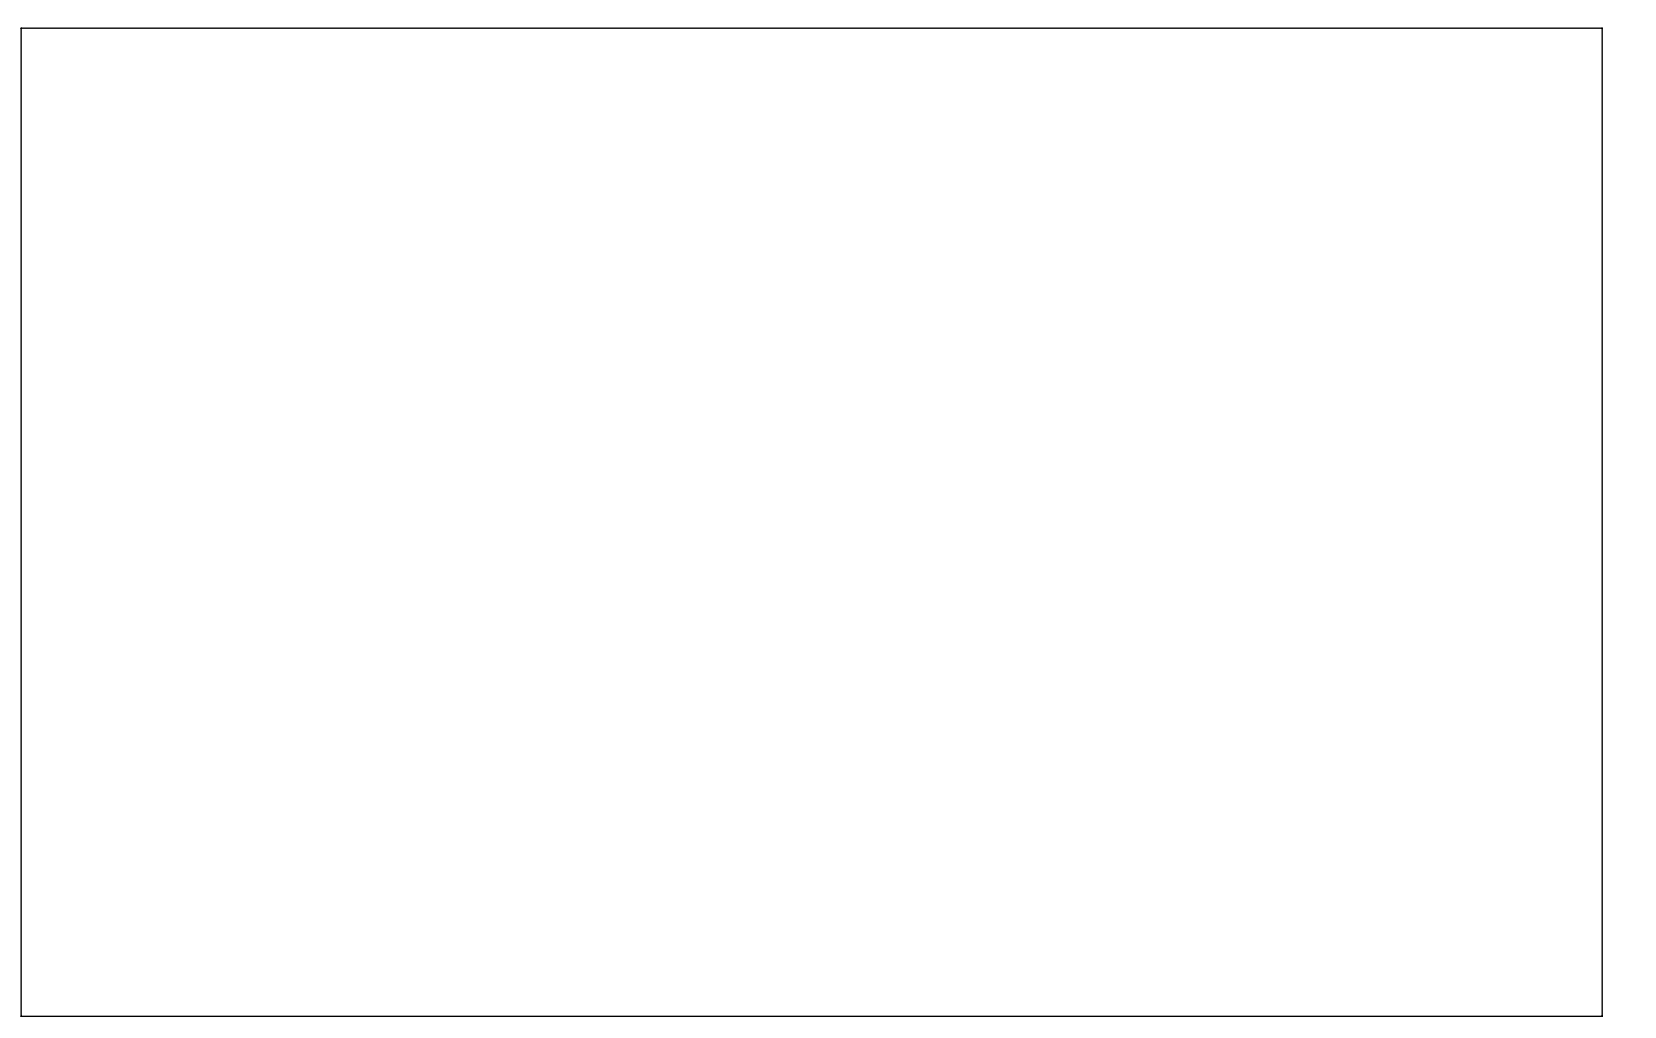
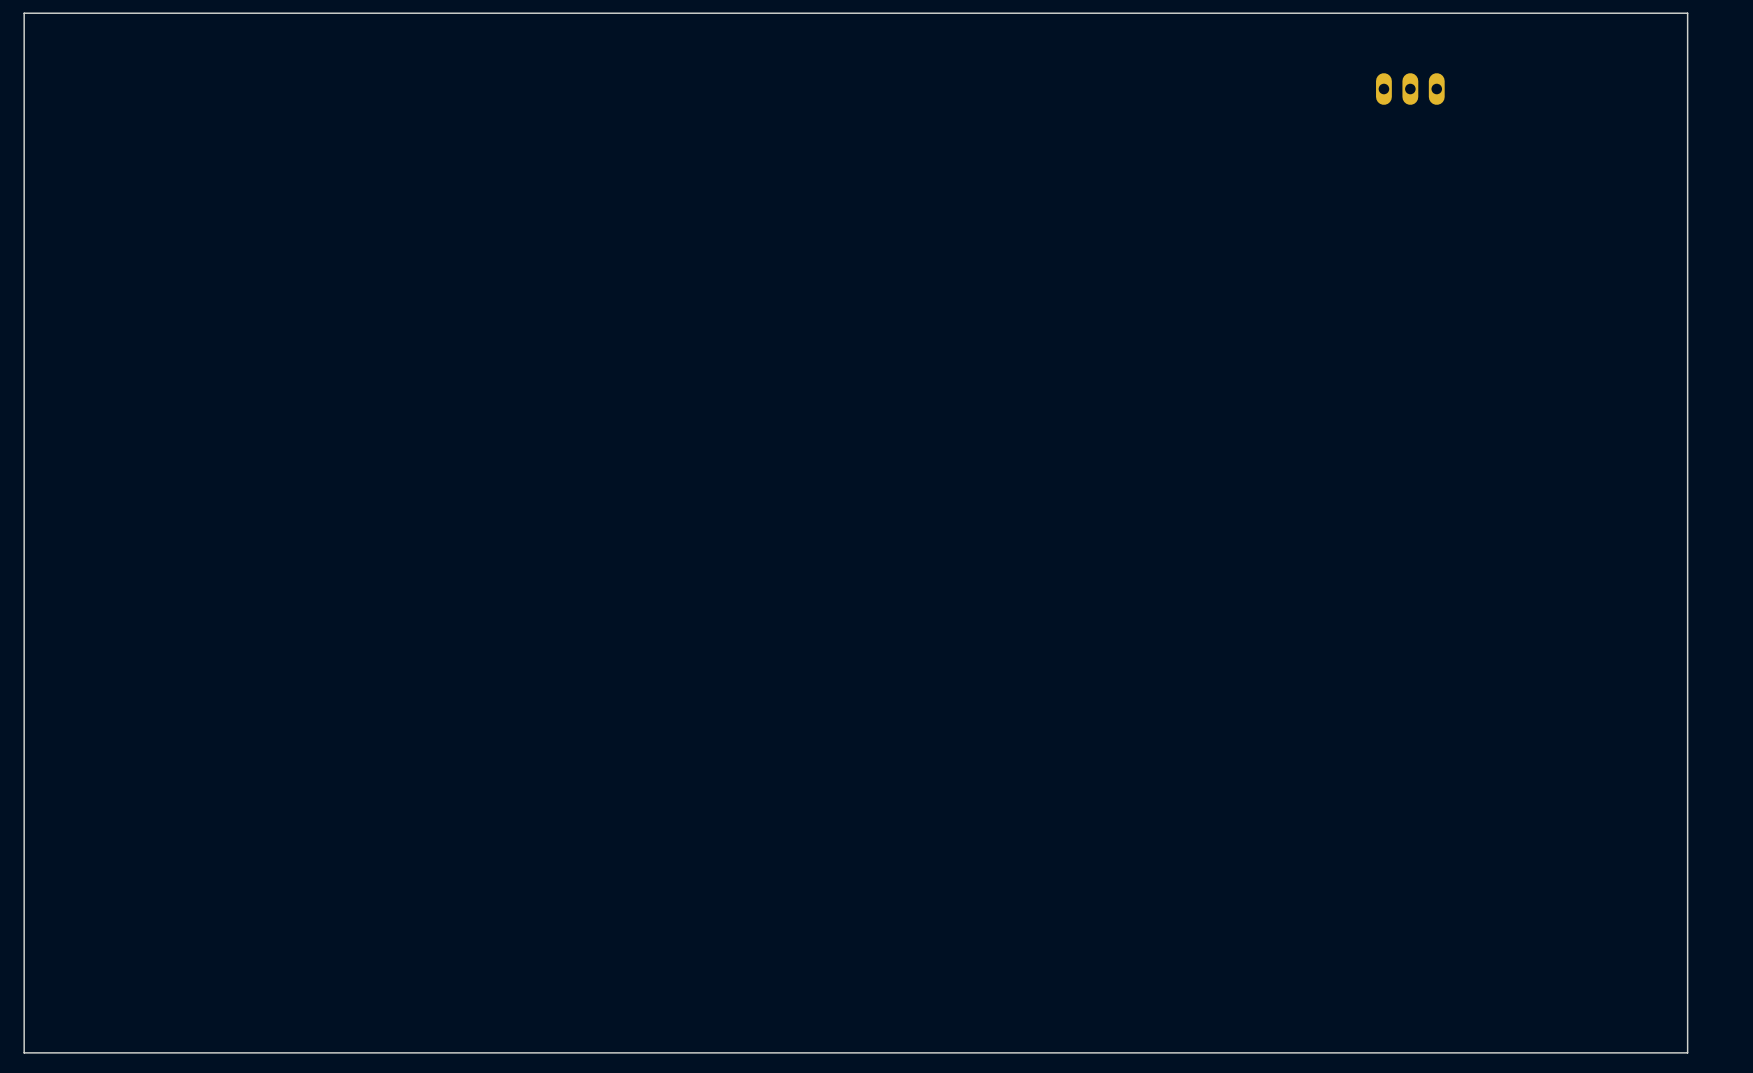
part: none -> (1410, 89)

